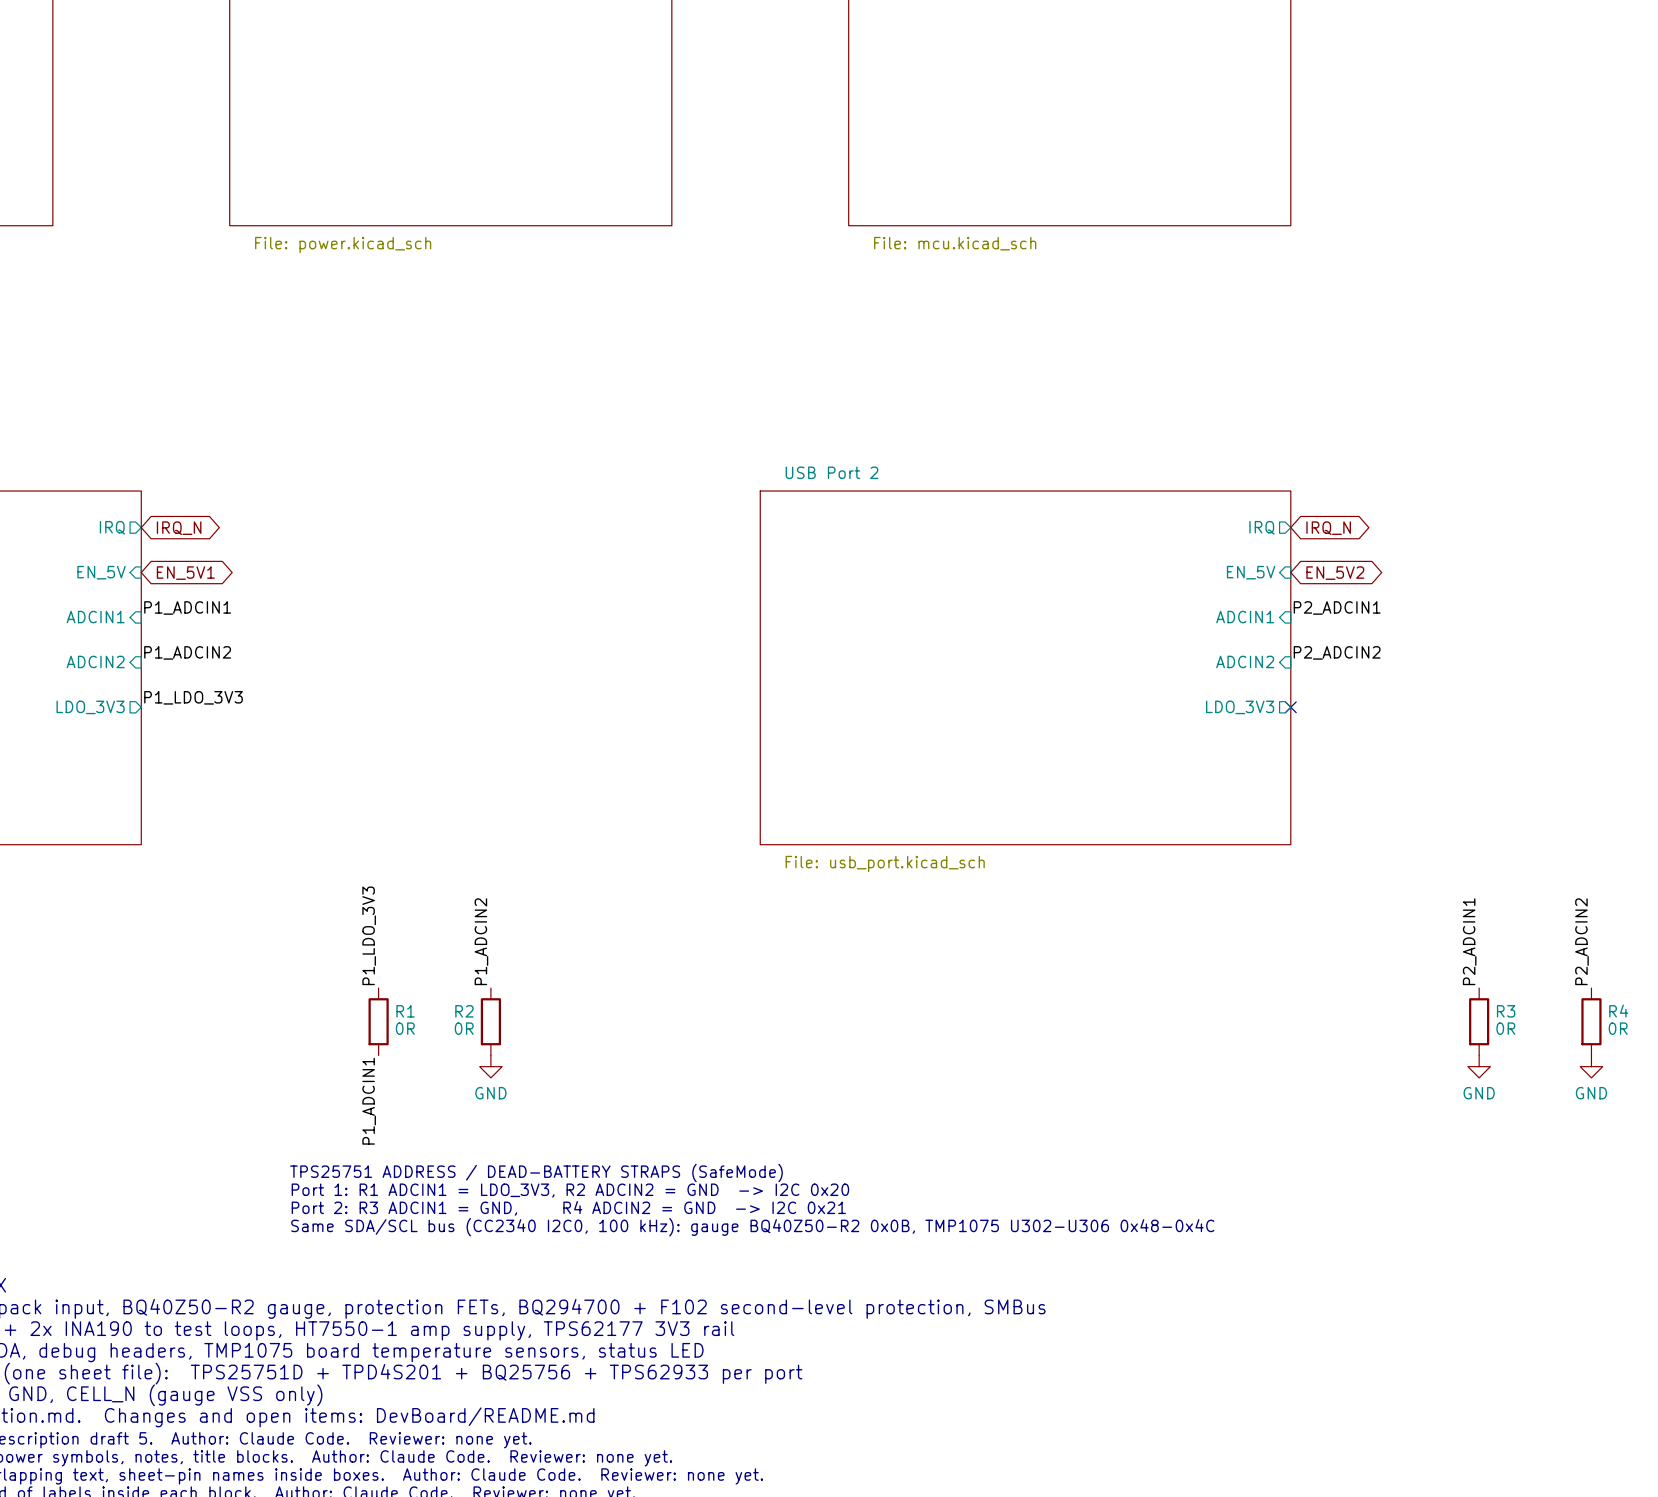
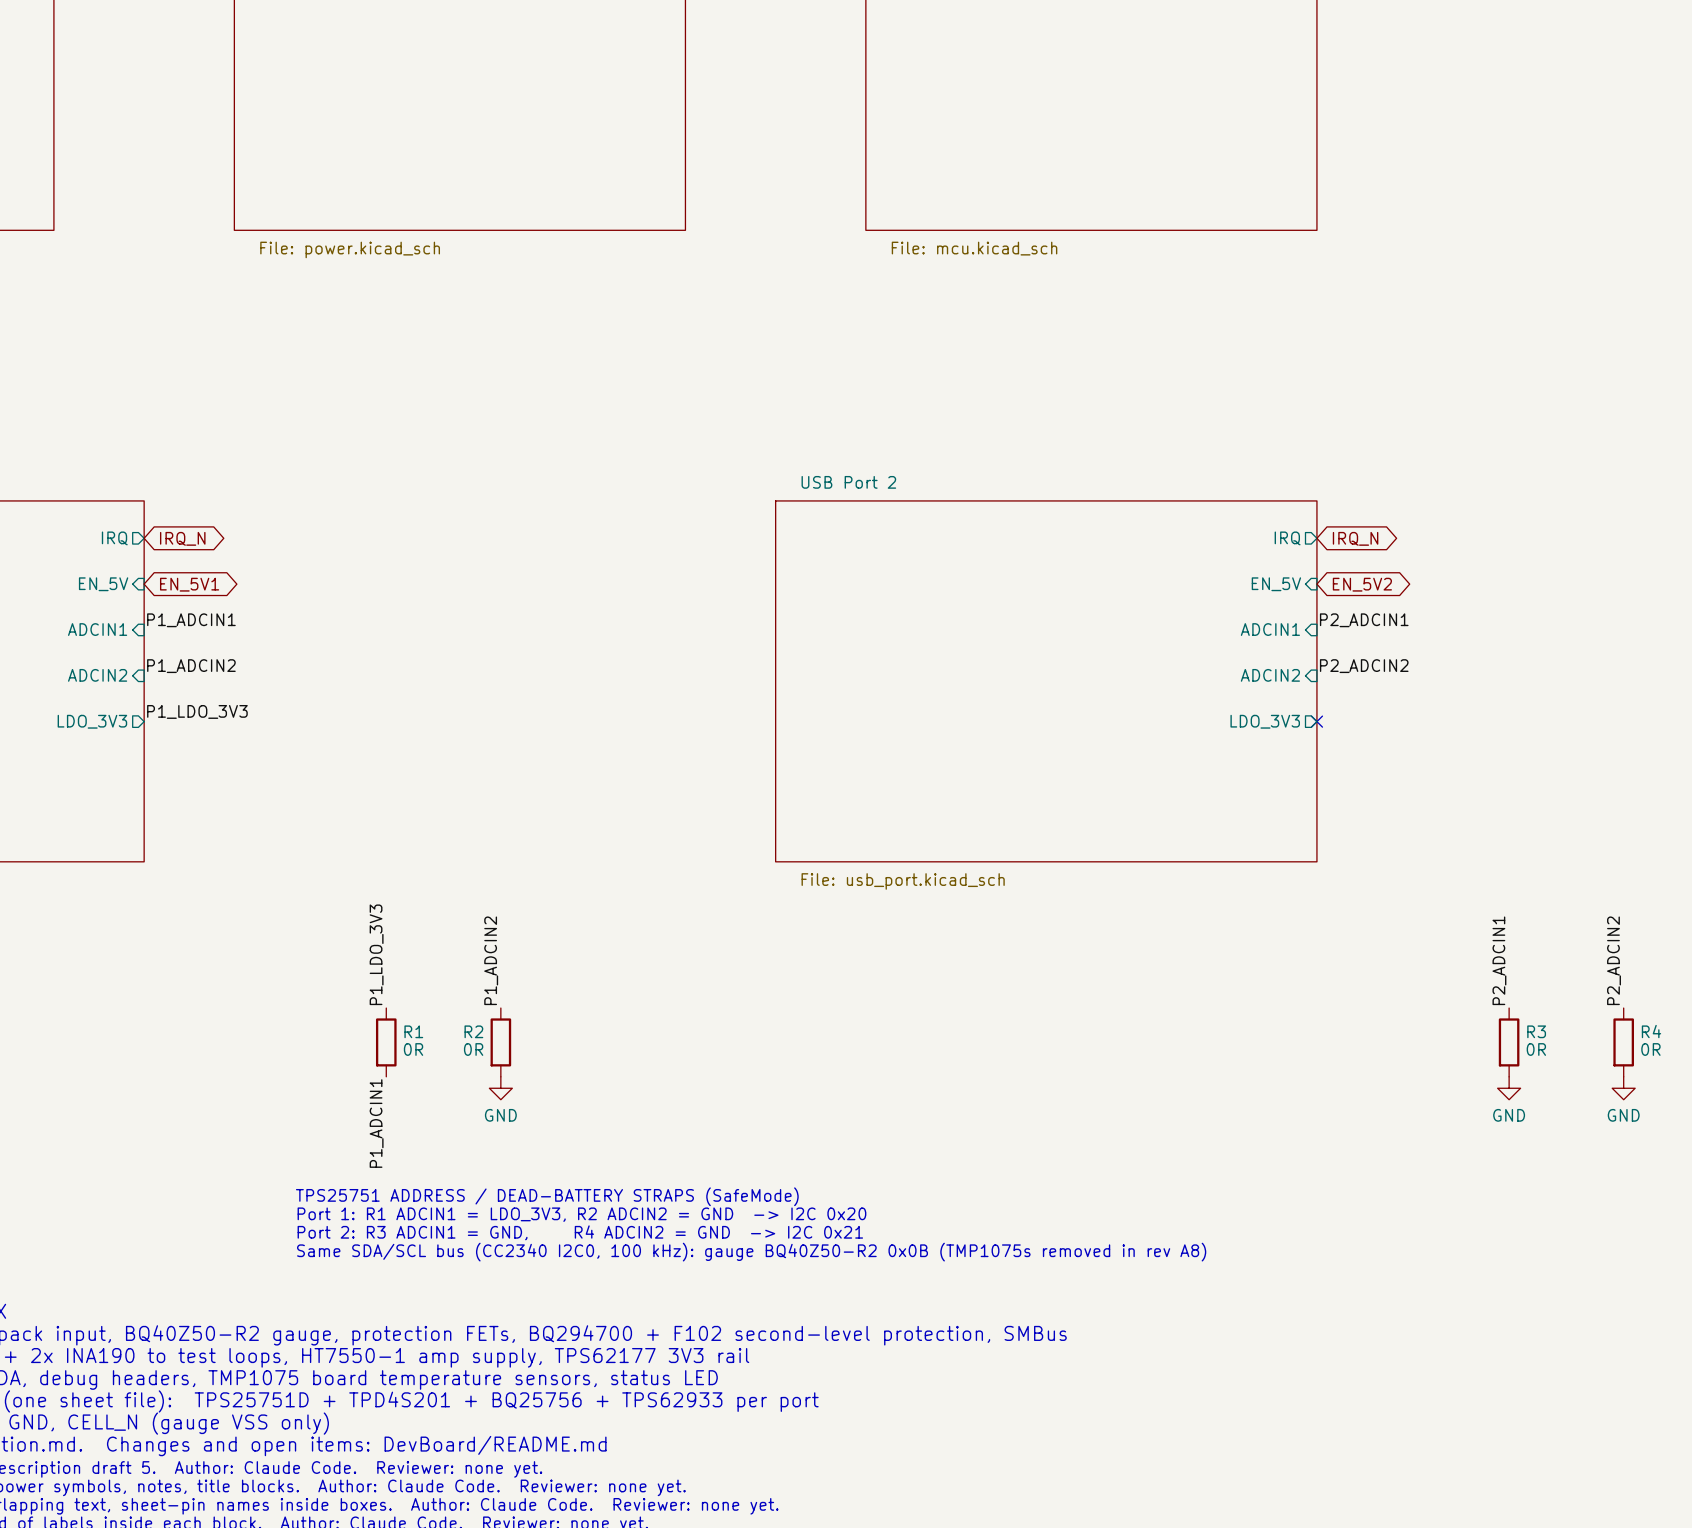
text: Same SDA/SCL bus (CC2340 I2C0, 100 kHz): gauge BQ40Z50-R2 0x0B, TMP1075 U302-U306 0x48-0x4C (752, 1227) -> Same SDA/SCL bus (CC2340 I2C0, 100 kHz): gauge BQ40Z50-R2 0x0B (TMP1075s removed in rev A8) (751, 1252)

